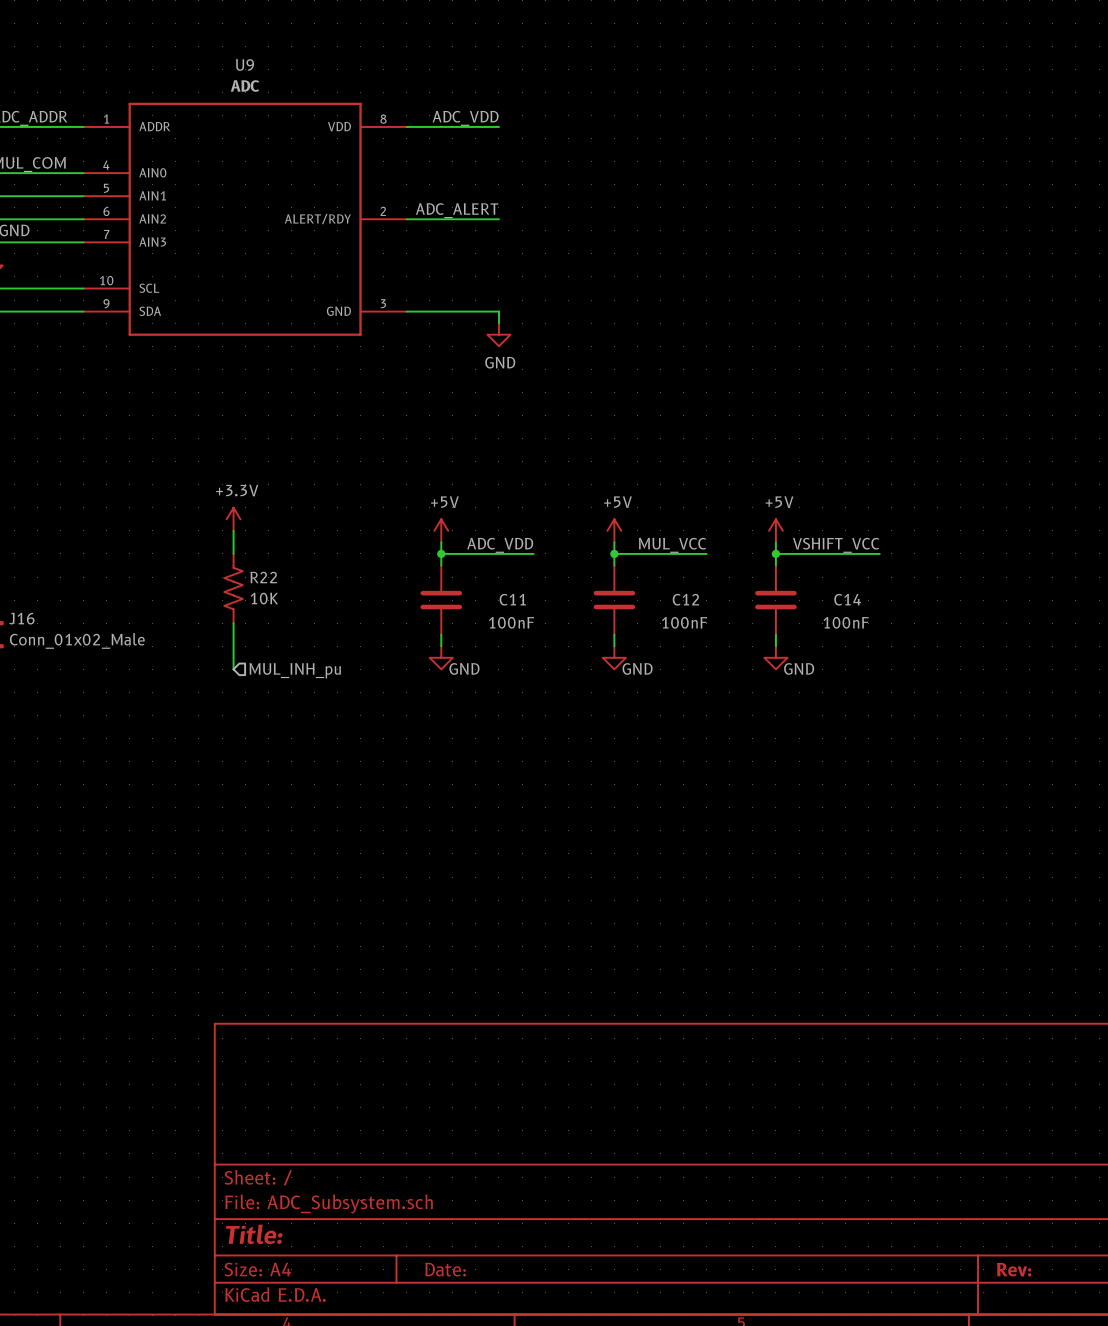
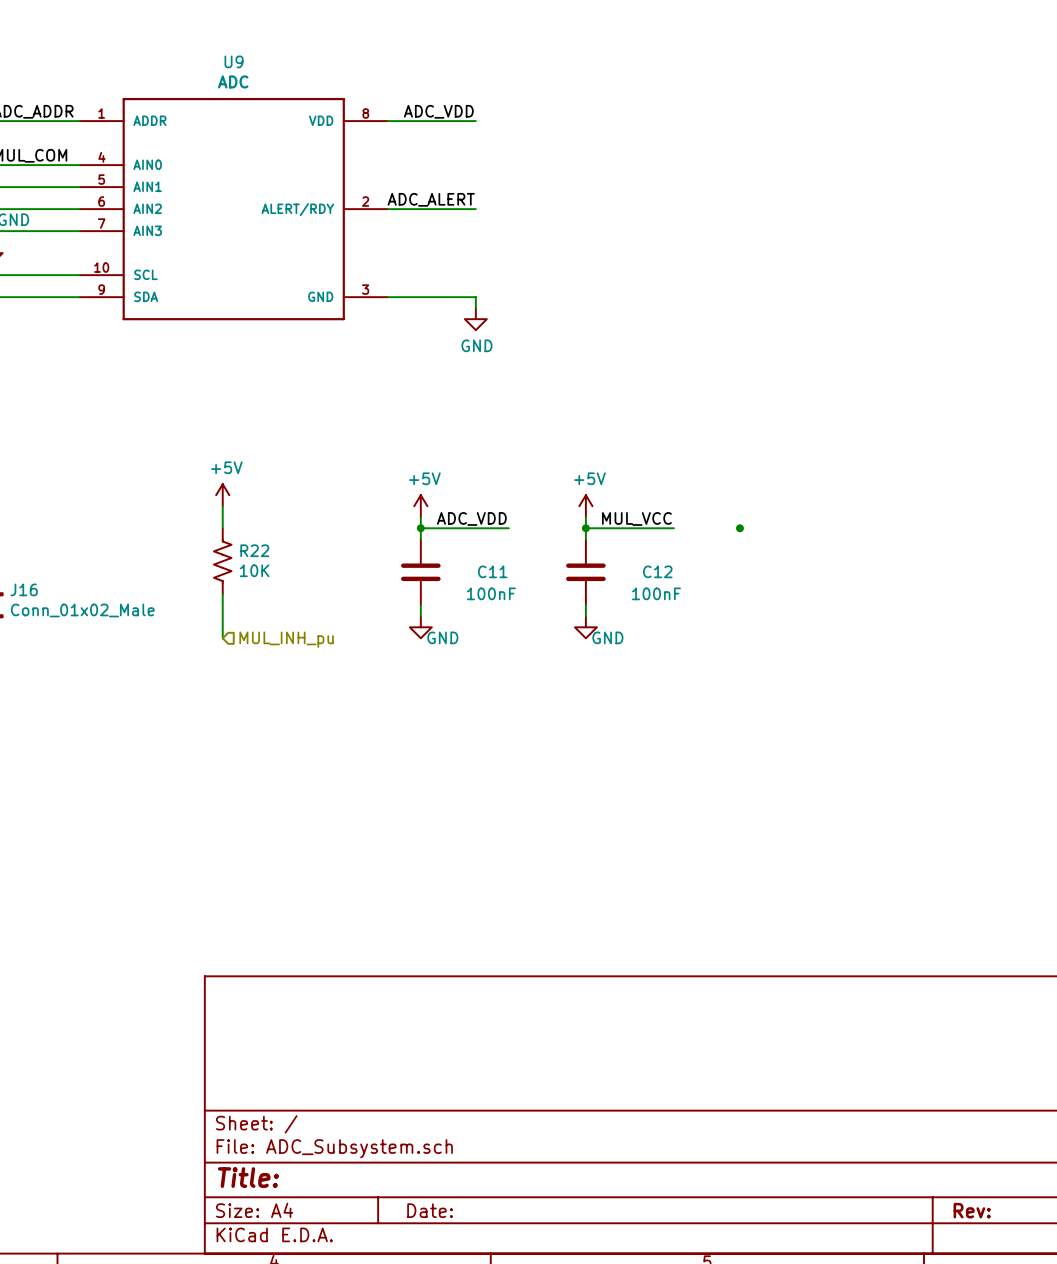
power symbol: +3.3V (233, 519) -> +5V (222, 495)
power symbol: +5V (775, 530) -> none
wire: (775, 542) (775, 565) -> none
label: VSHIFT_VCC (836, 545) -> none
wire: (775, 553) (879, 553) -> none
C14: 100nF (775, 600) -> none
wire: (775, 634) (775, 646) -> none
power symbol: GND (775, 657) -> none

